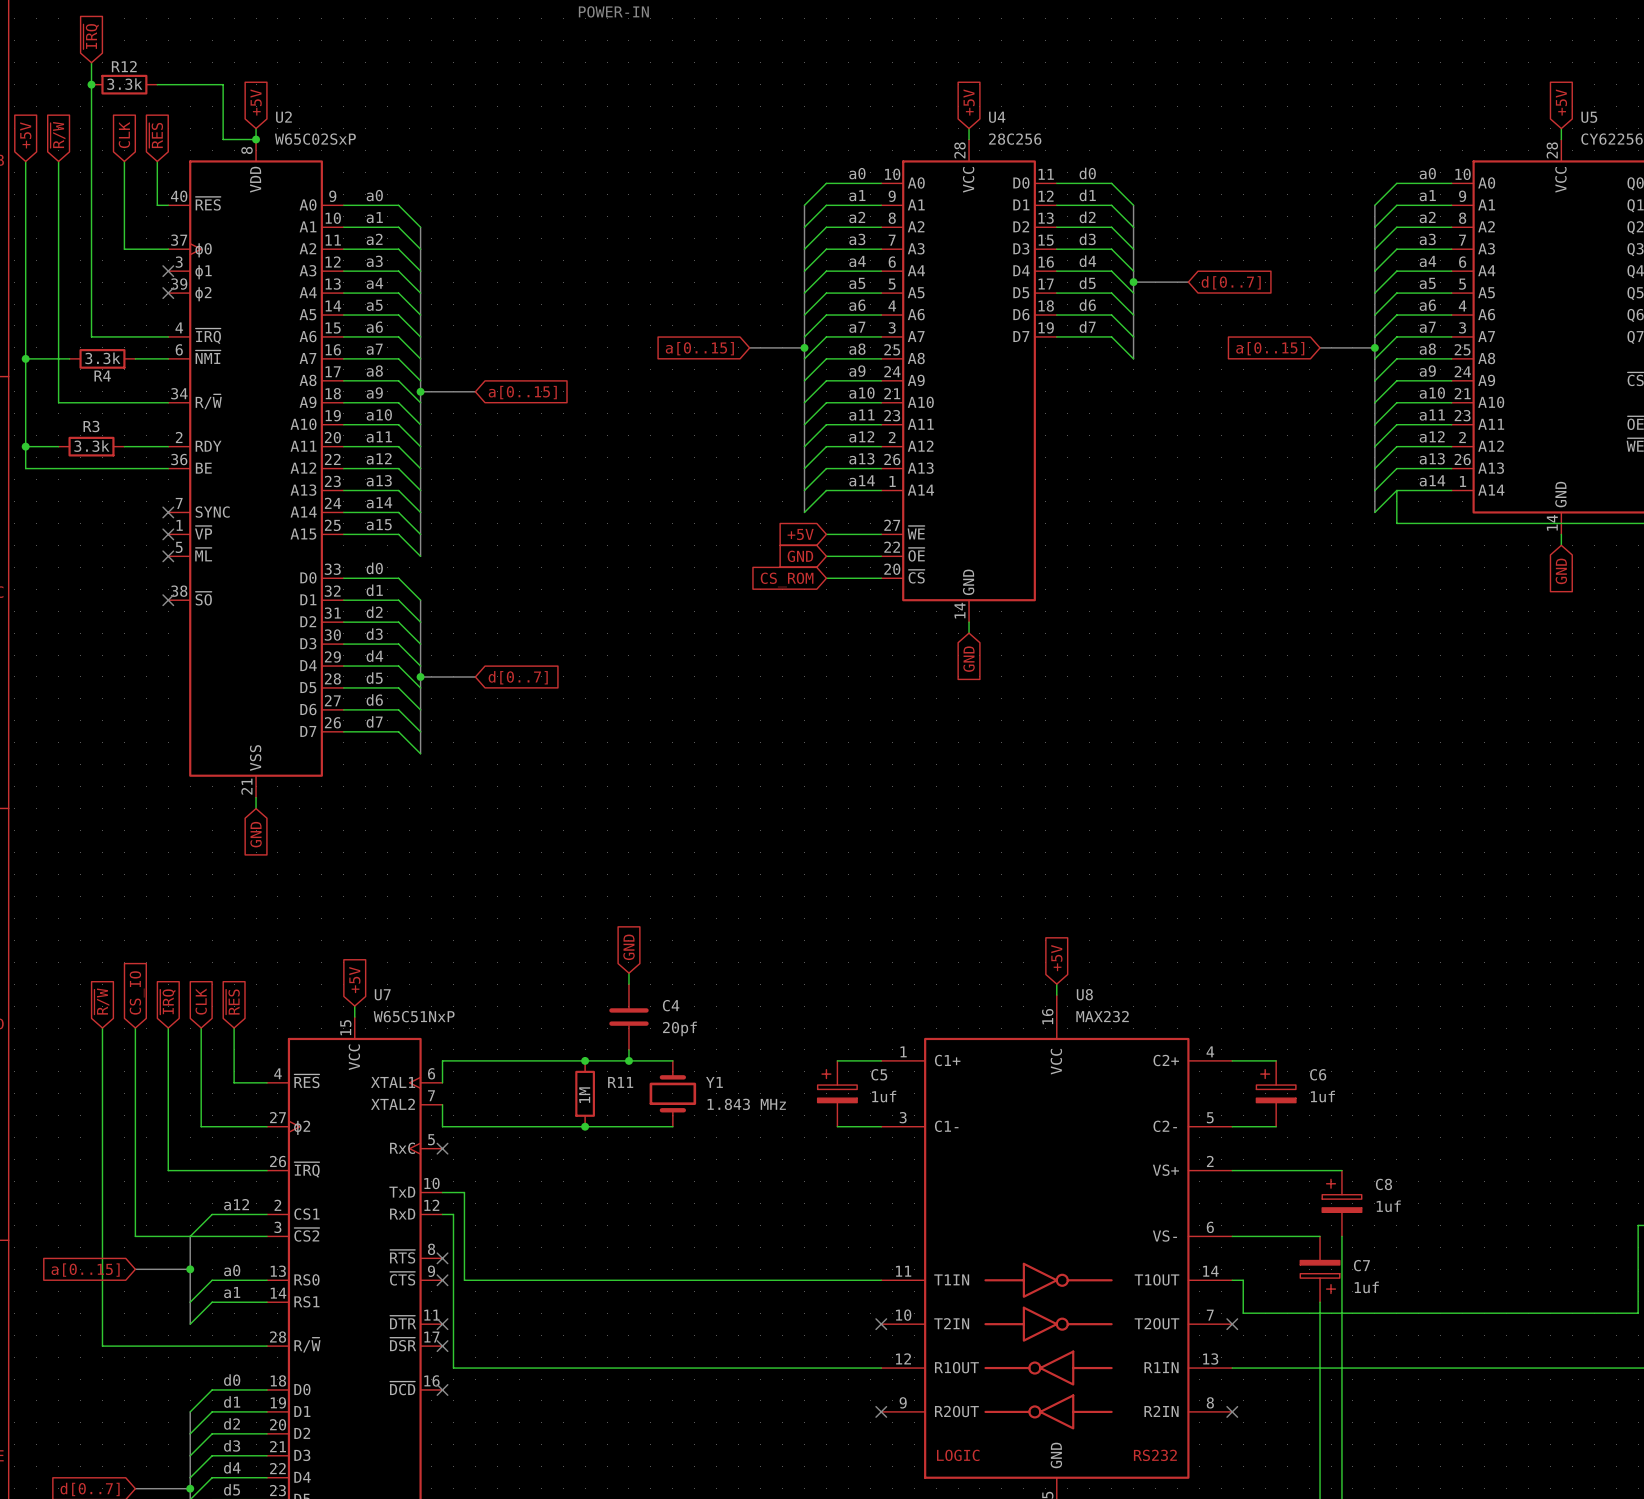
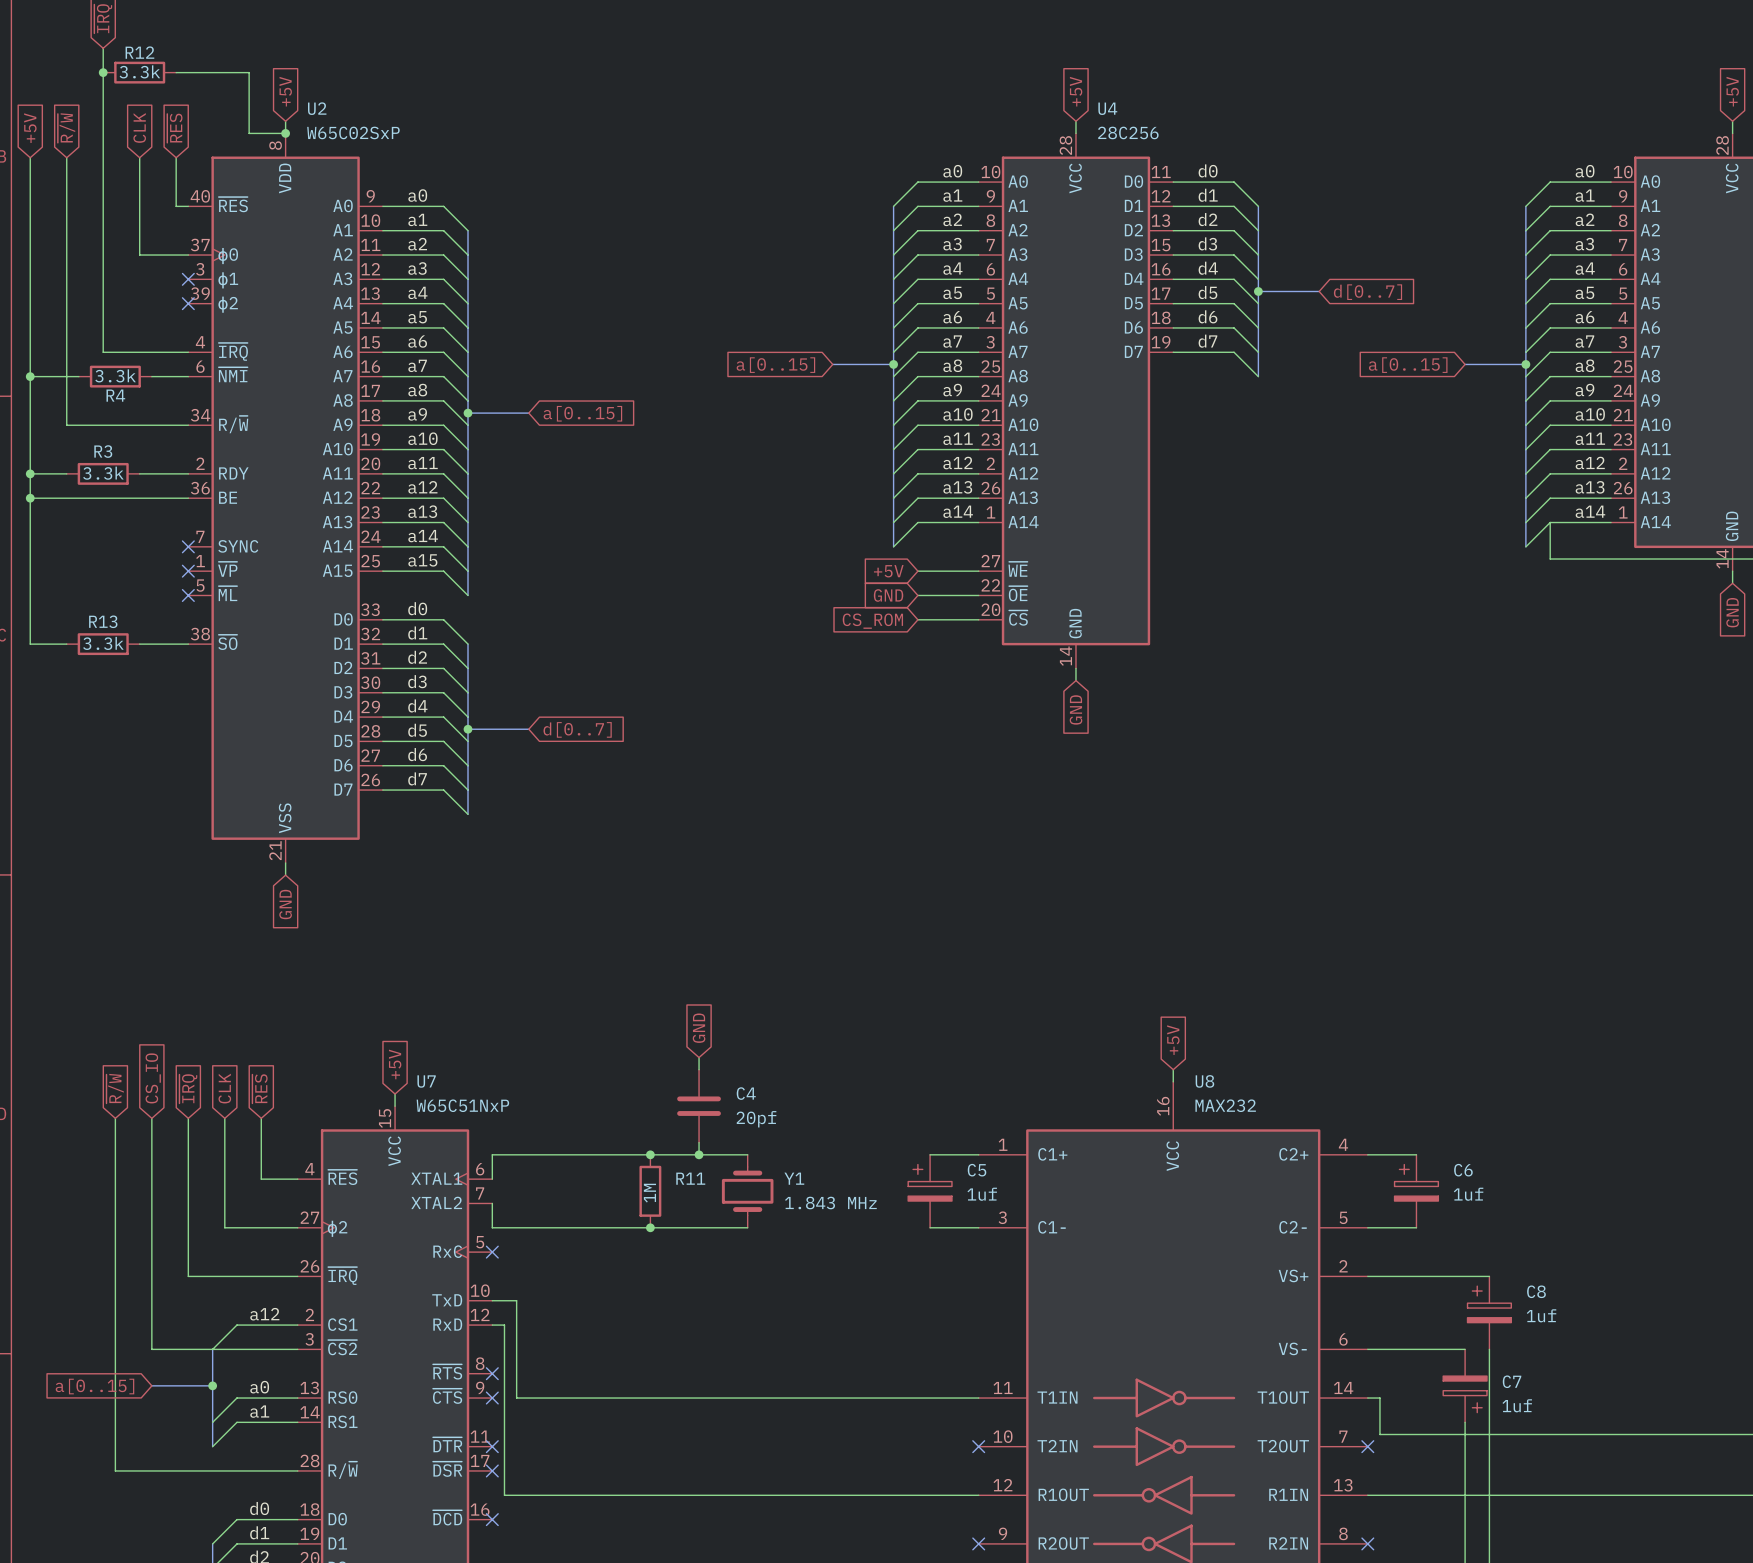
wire: none -> (30, 498) (30, 644) (66, 644)
junction: none -> (30, 498)
R13: none -> 3.3k (103, 644)
wire: none -> (139, 644) (188, 644)
no-connect mark: (168, 600) -> none

